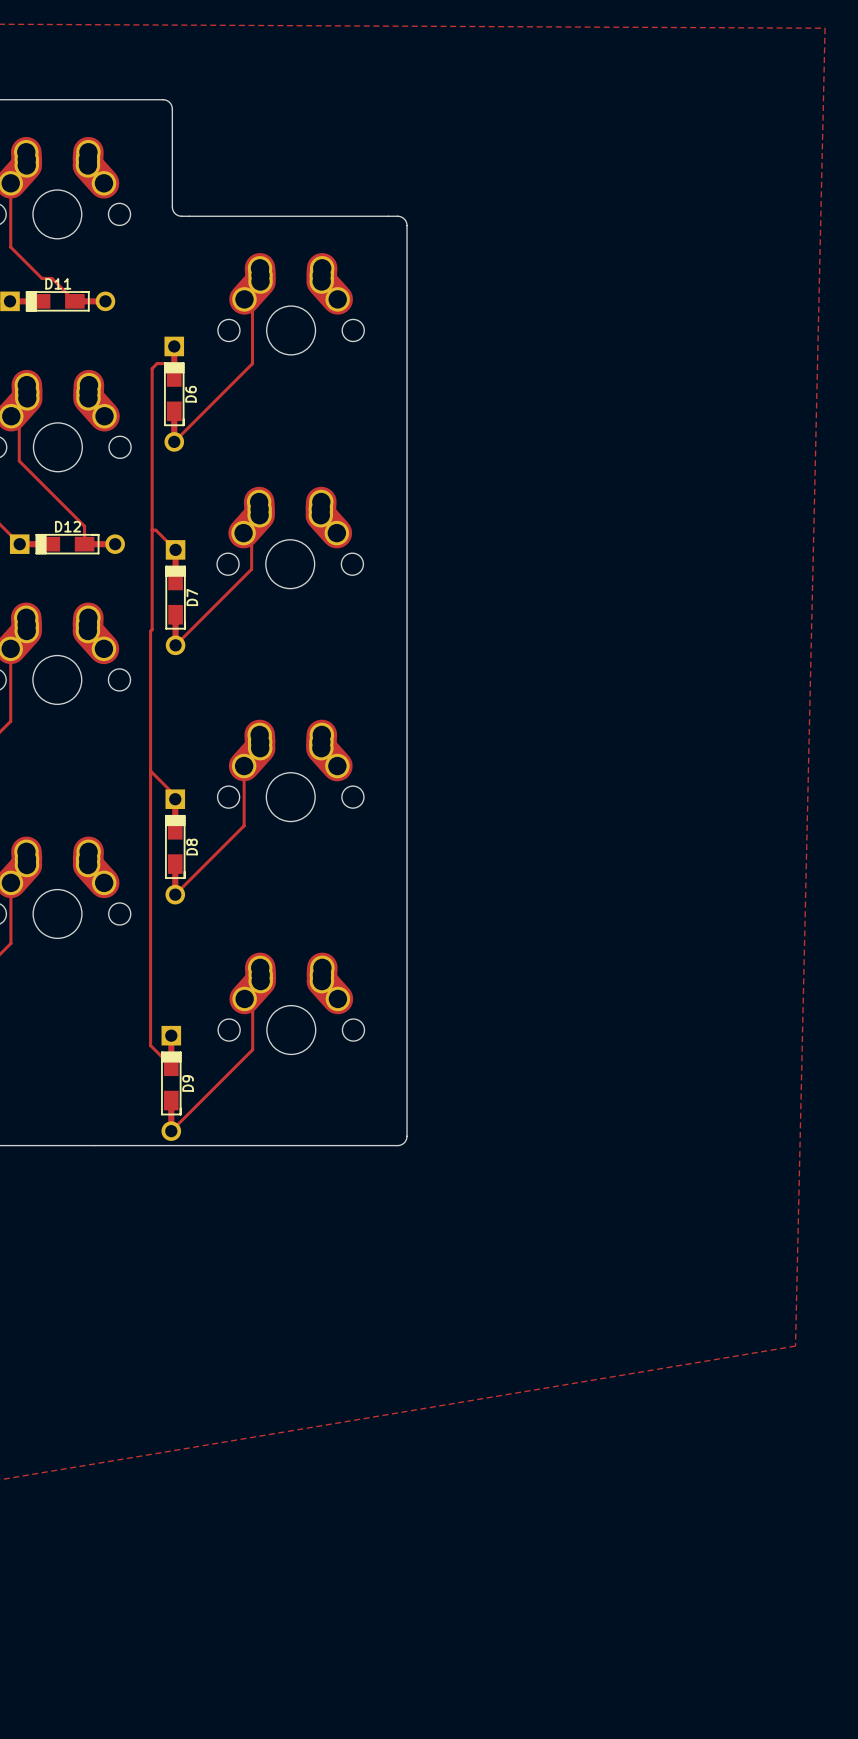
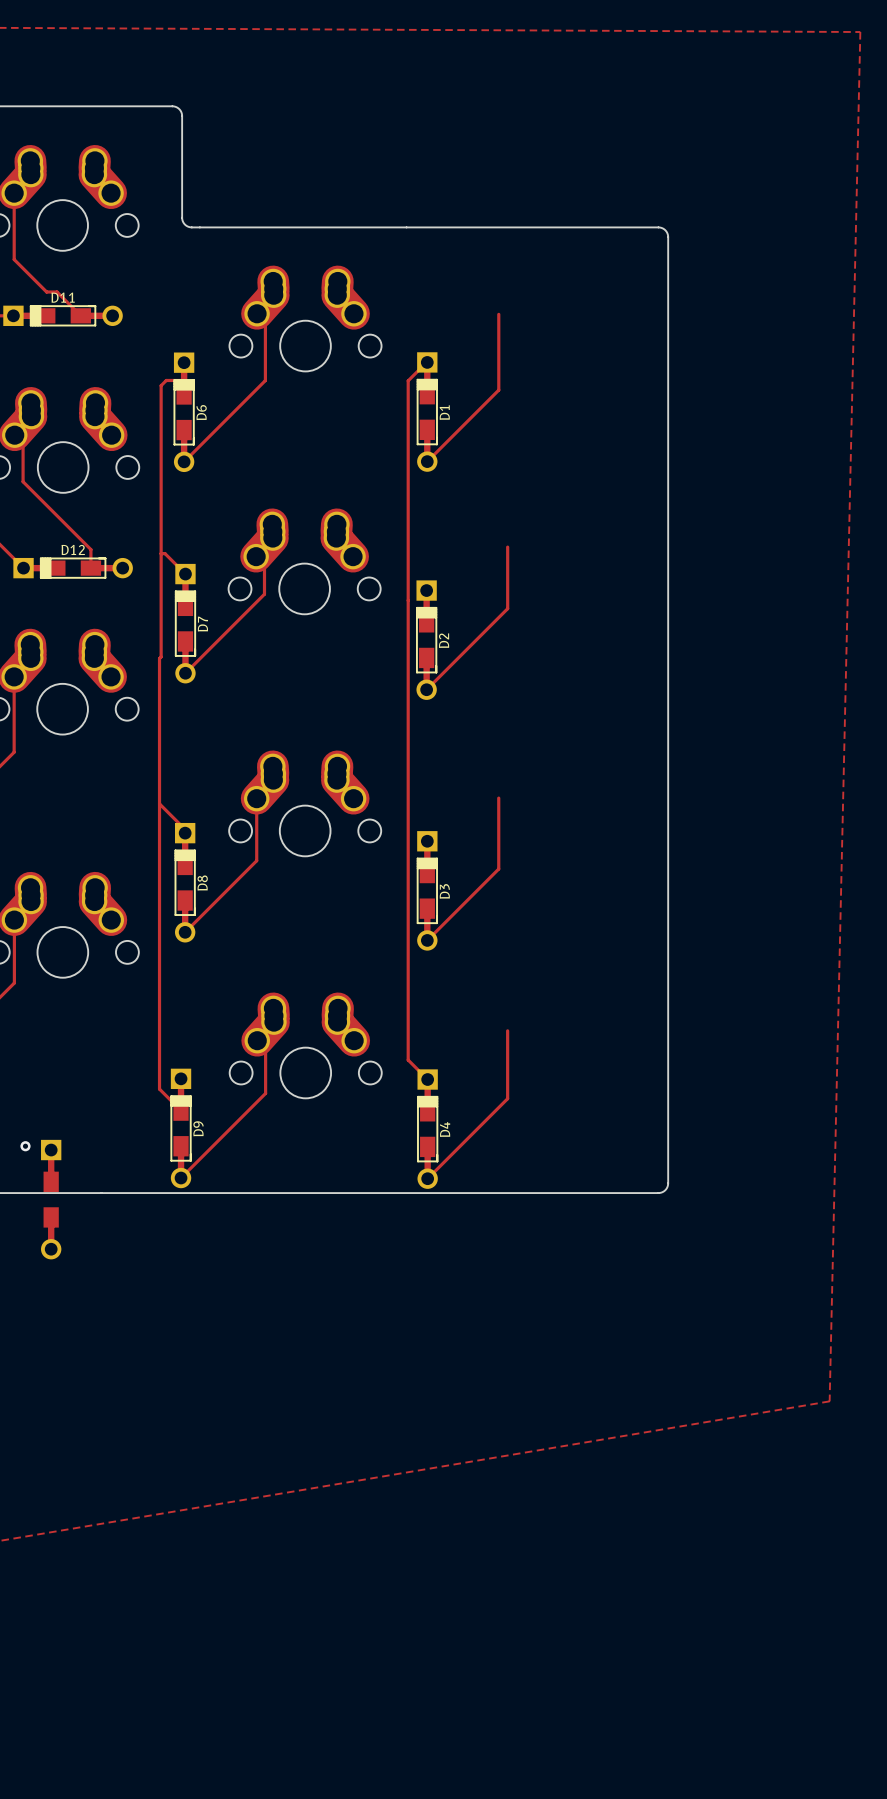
board edge: (397, 216) (404, 219) (407, 225) (407, 1136) (404, 1142) (397, 1145) -> (416, 227) (658, 227) (665, 230) (668, 237) (667, 1185) (664, 1191) (658, 1193) (416, 1193)
track: none -> (498, 314) (498, 390) (427, 461)
track: none -> (427, 362) (408, 380) (408, 1060) (427, 1079)
D1: none -> (427, 412)
track: none -> (507, 547) (507, 608) (426, 689)
D2: none -> (426, 640)
track: none -> (498, 798) (498, 869) (427, 940)
D3: none -> (427, 890)
track: none -> (507, 1030) (507, 1098) (427, 1178)
D4: none -> (427, 1129)
via: none -> (25, 1146)
part: none -> (51, 1199)

